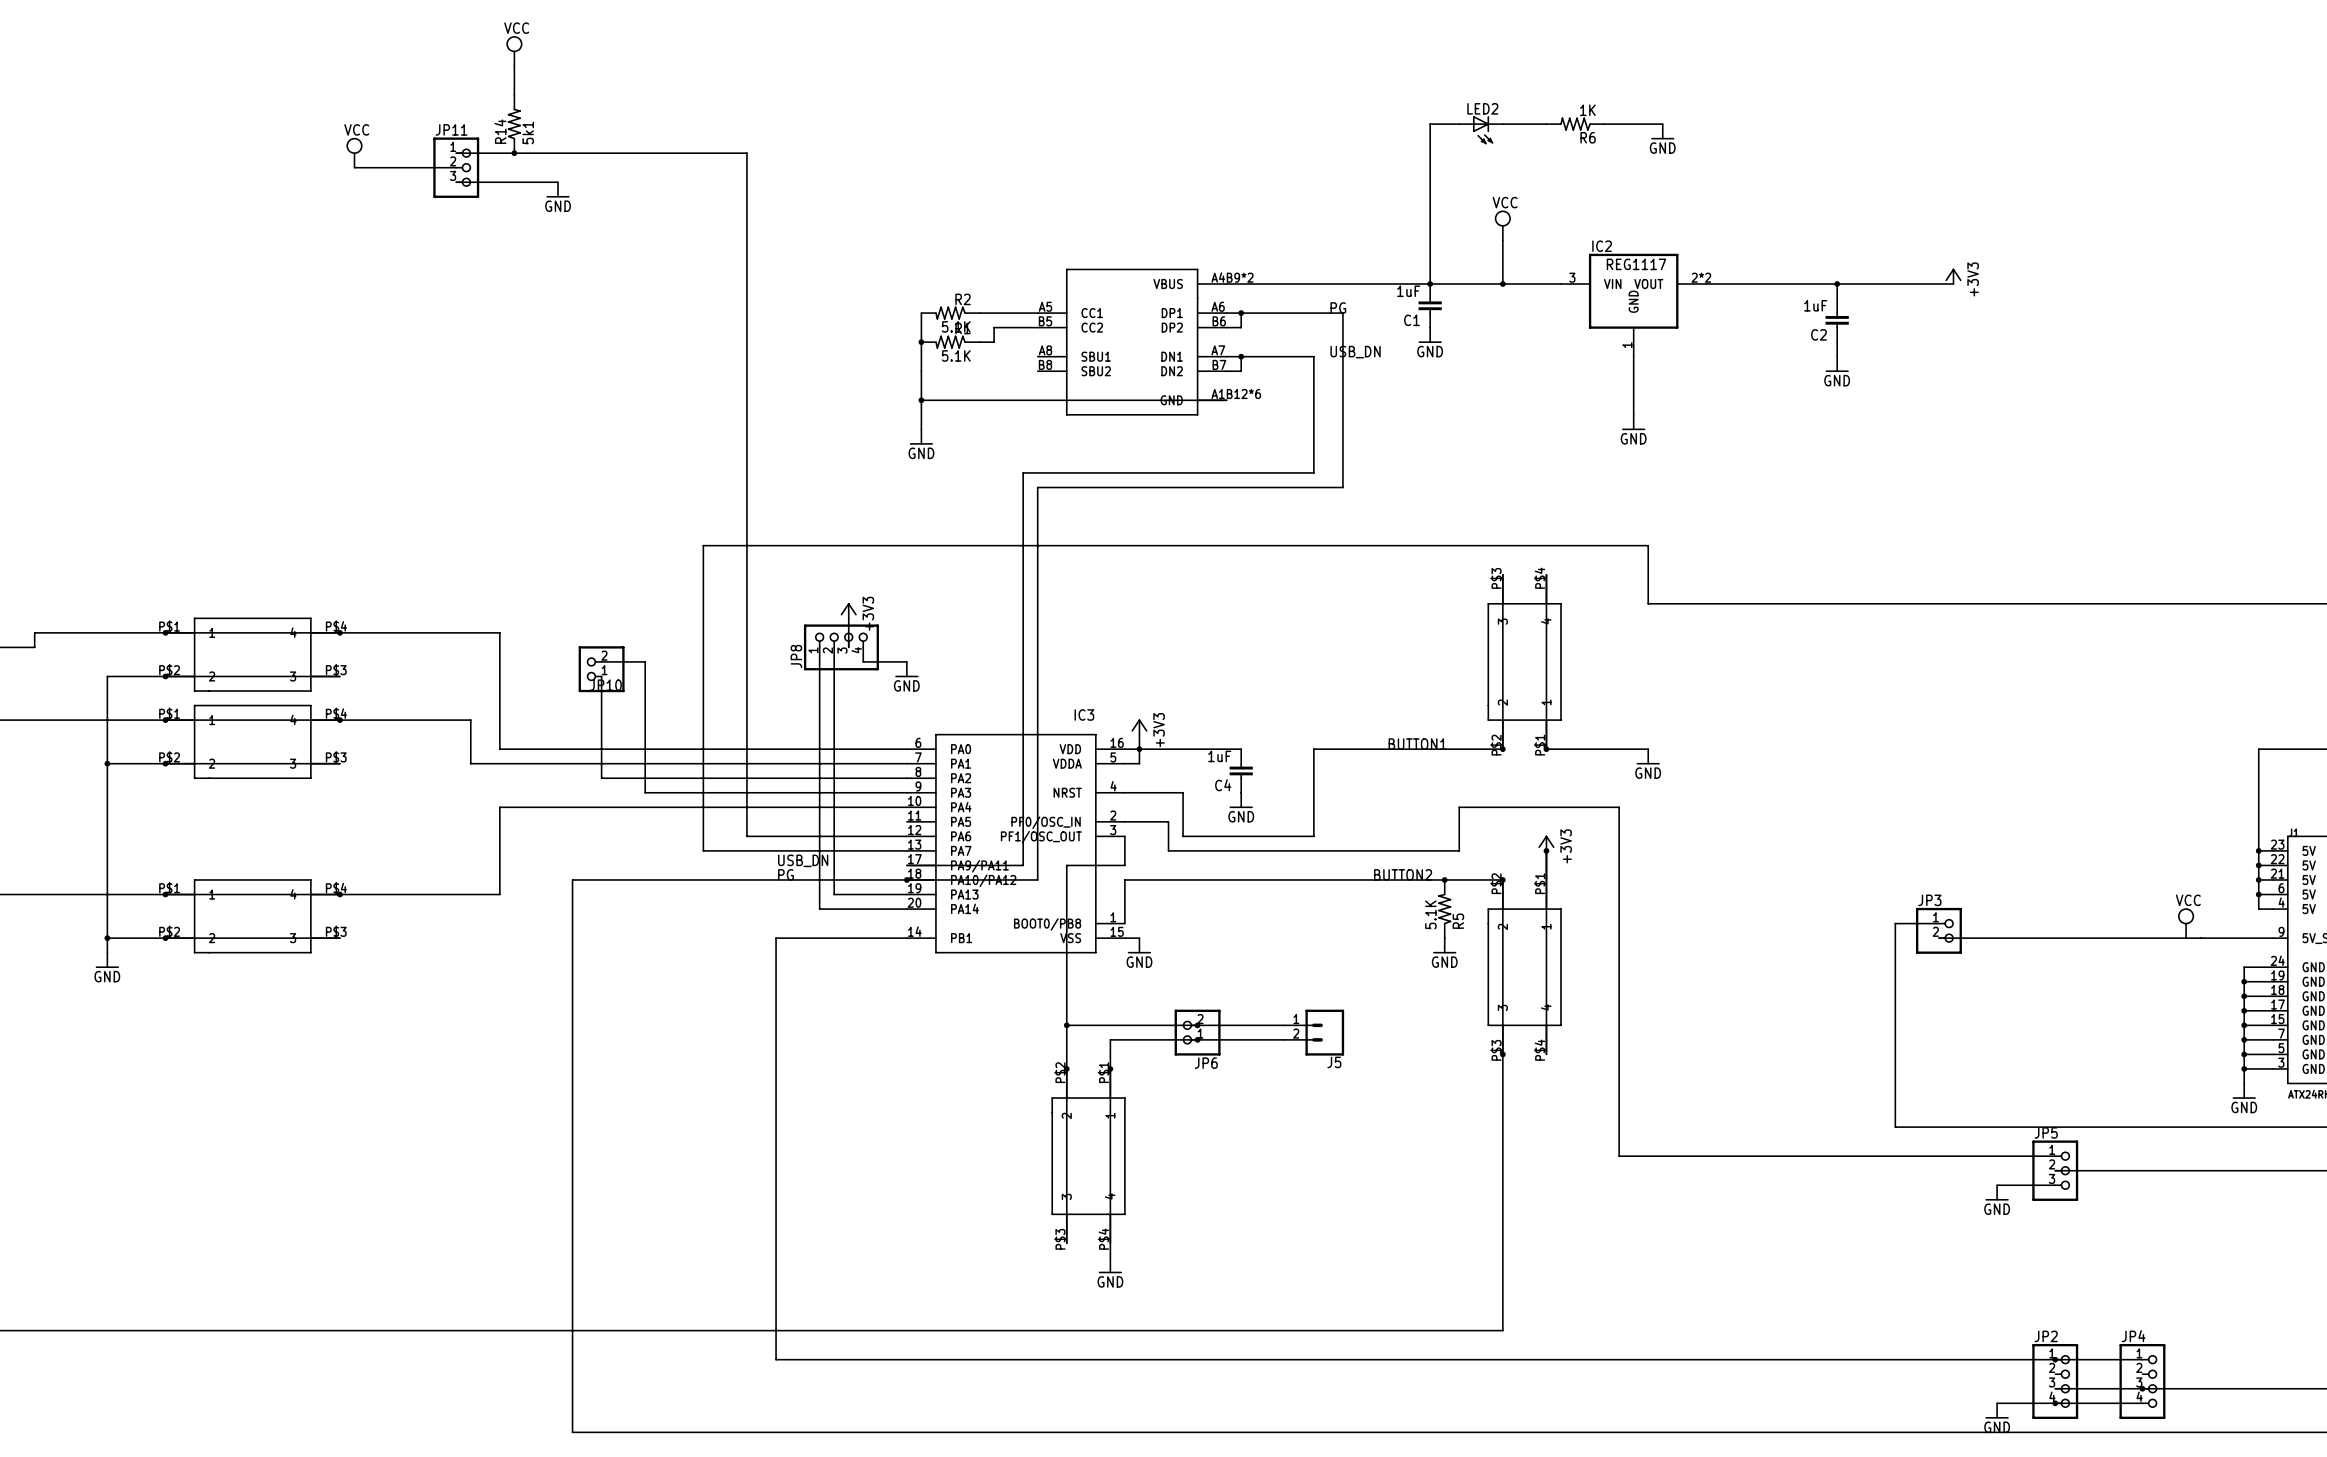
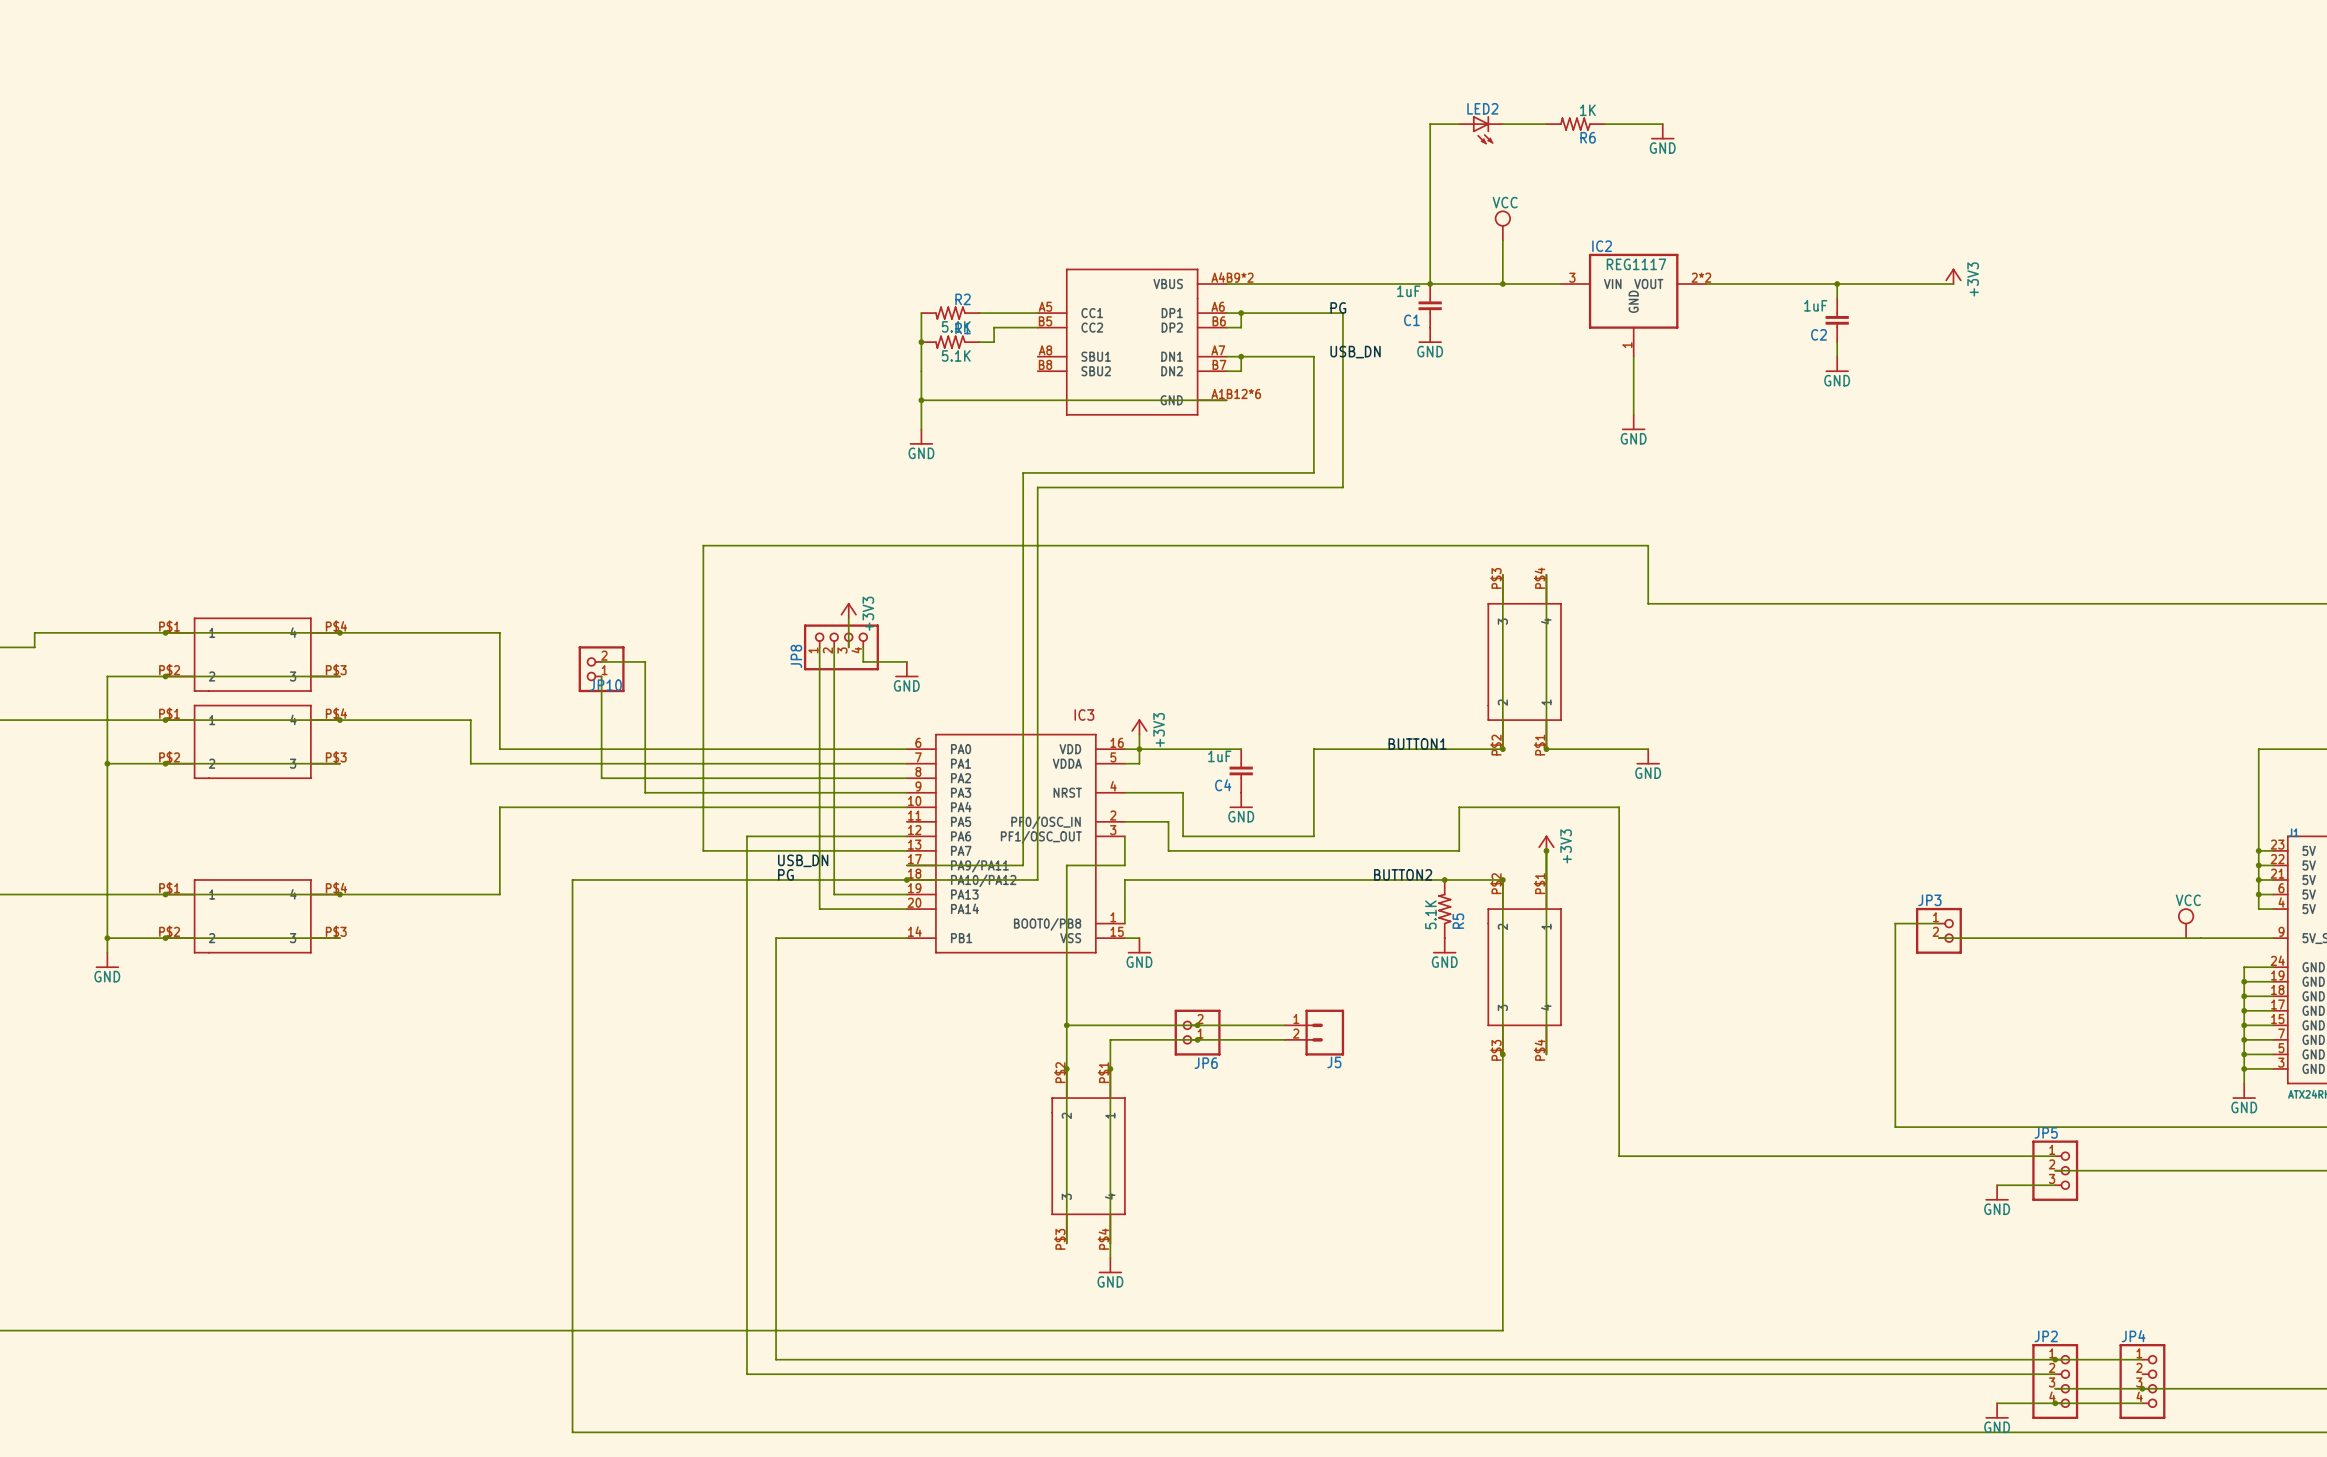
power symbol: VCC (514, 51) -> none
wire: (514, 65) (514, 95) -> none
R14: 5k1 (514, 124) -> none
power symbol: VCC (354, 152) -> none
wire: (456, 153) (746, 153) (746, 836) -> (2055, 1374) (746, 1374) (746, 836)
junction: (514, 153) -> none
wire: (354, 167) (456, 167) -> none
JP11: (456, 167) -> none
wire: (456, 182) (558, 182) -> none
power symbol: GND (558, 189) -> none

